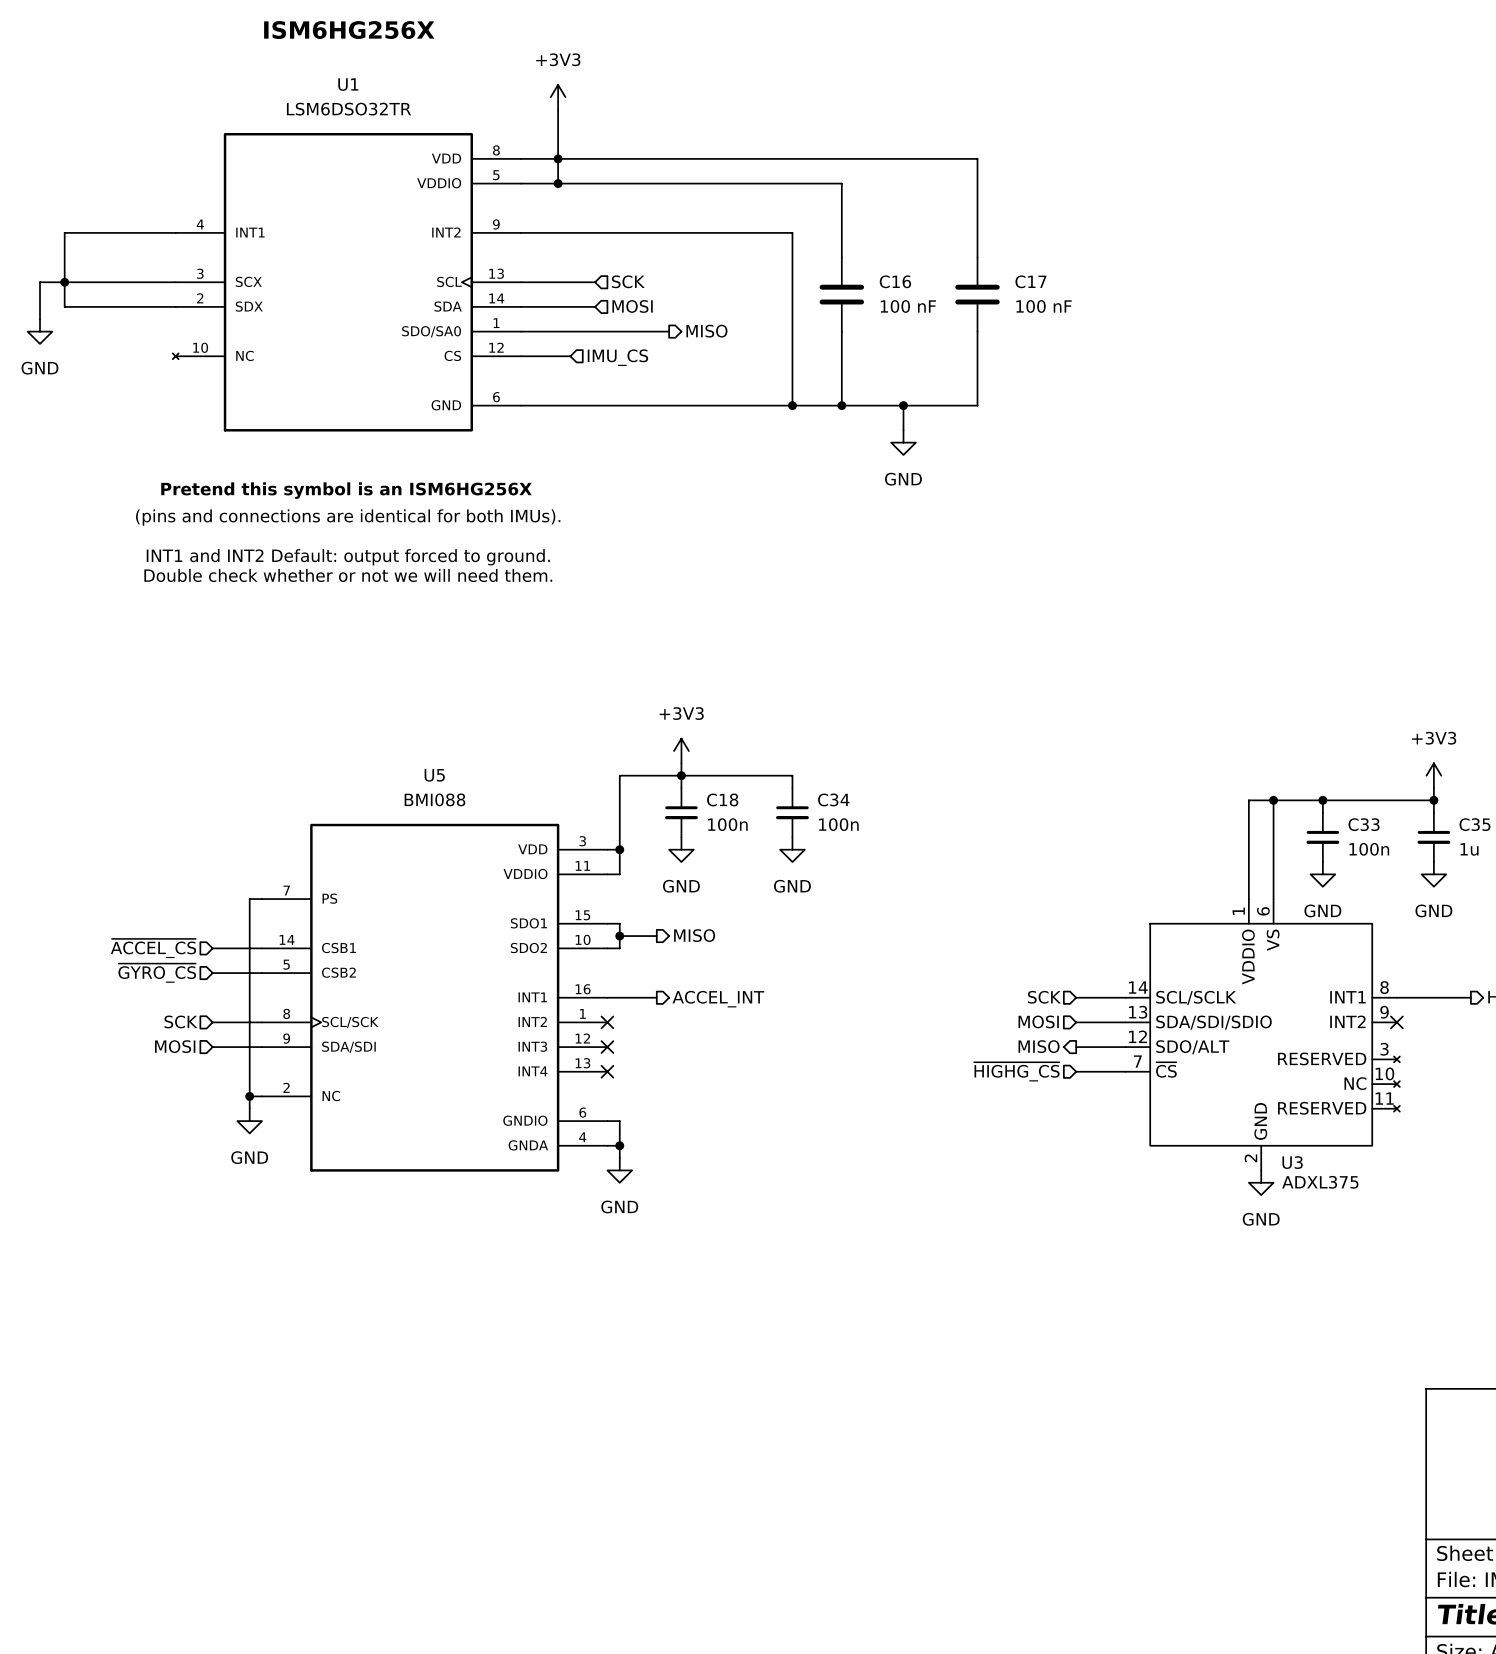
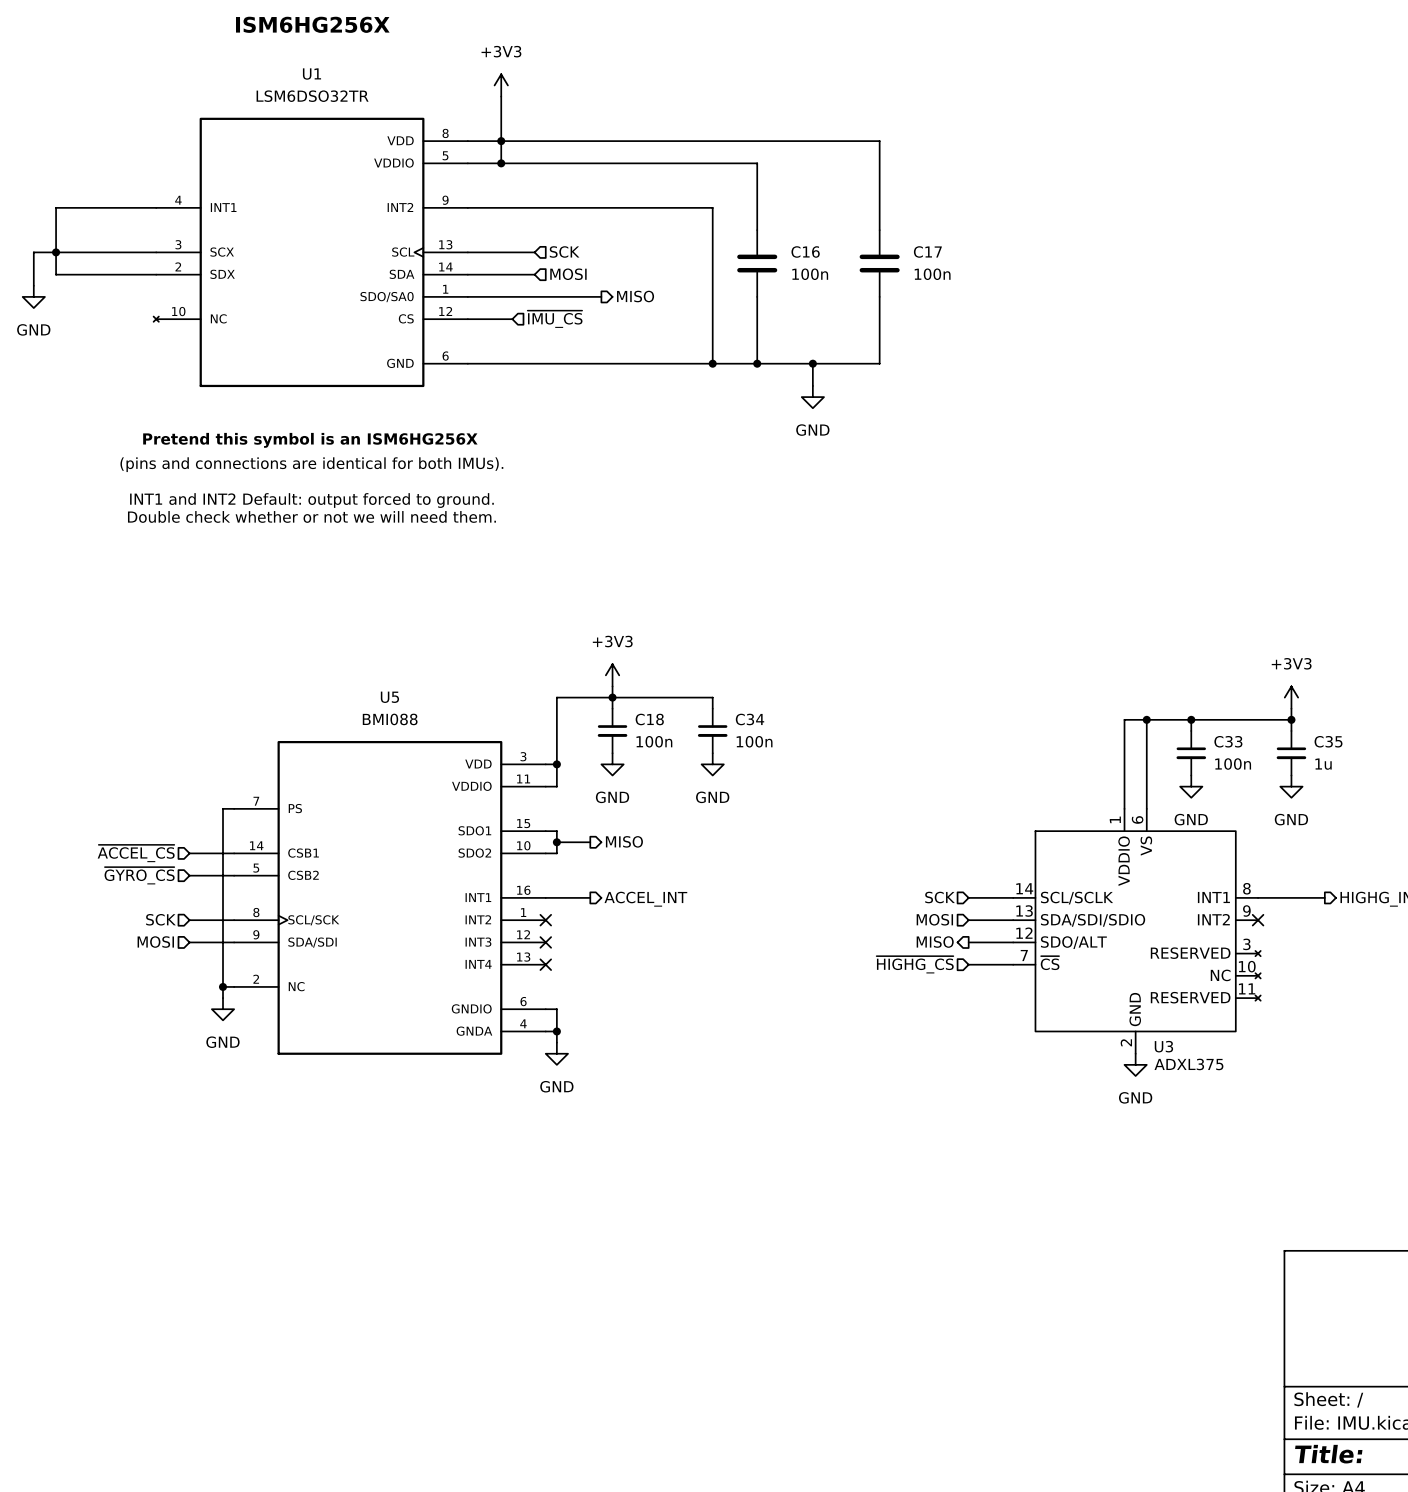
C16 value: 100 nF (908, 306) -> 100n (810, 274)
C17 value: 100 nF (1044, 306) -> 100n (932, 274)
hierarchical label: IMU_CS (617, 357) -> ~{IMU_CS} (555, 319)

